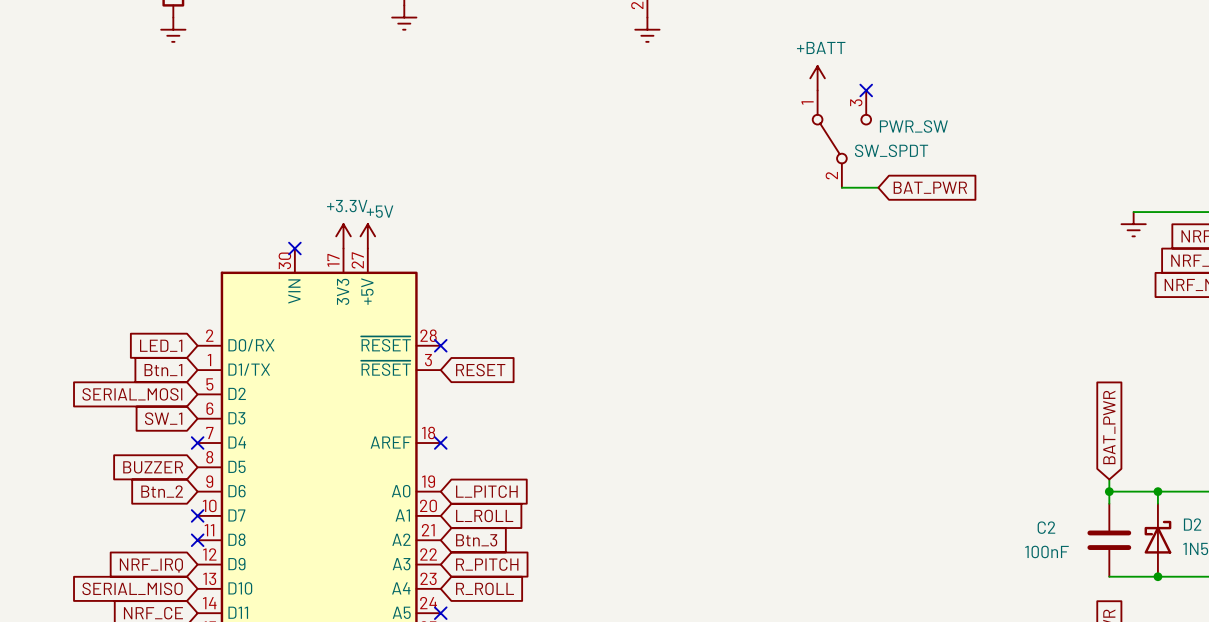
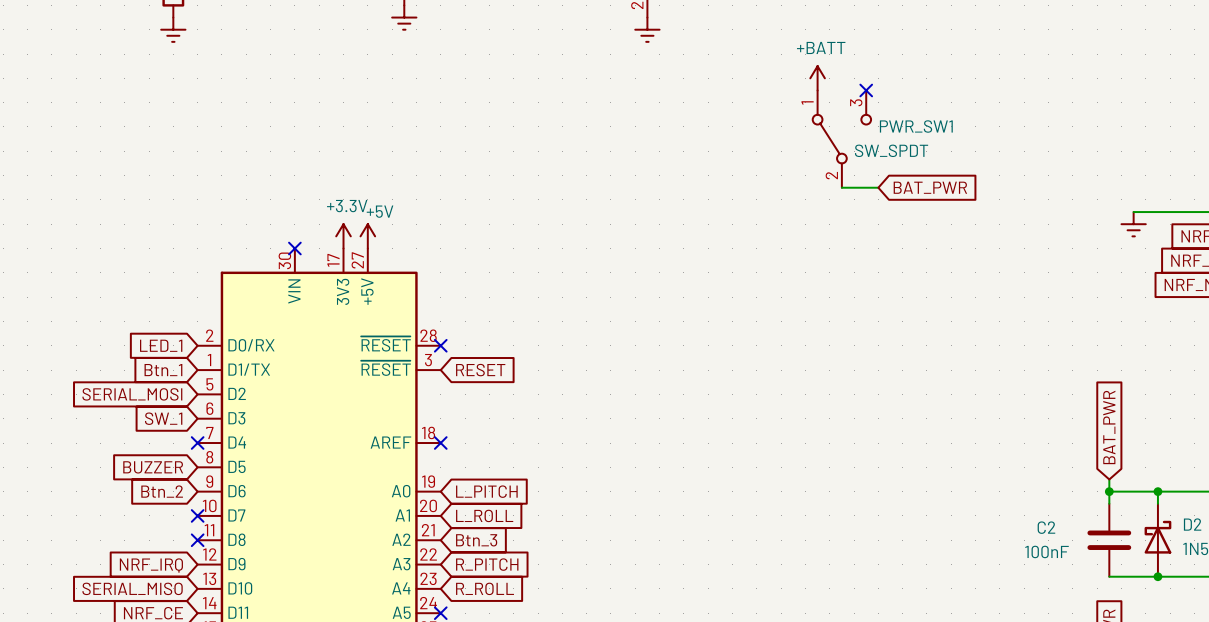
PWR_SW name: PWR_SW (913, 126) -> PWR_SW1 (916, 126)

